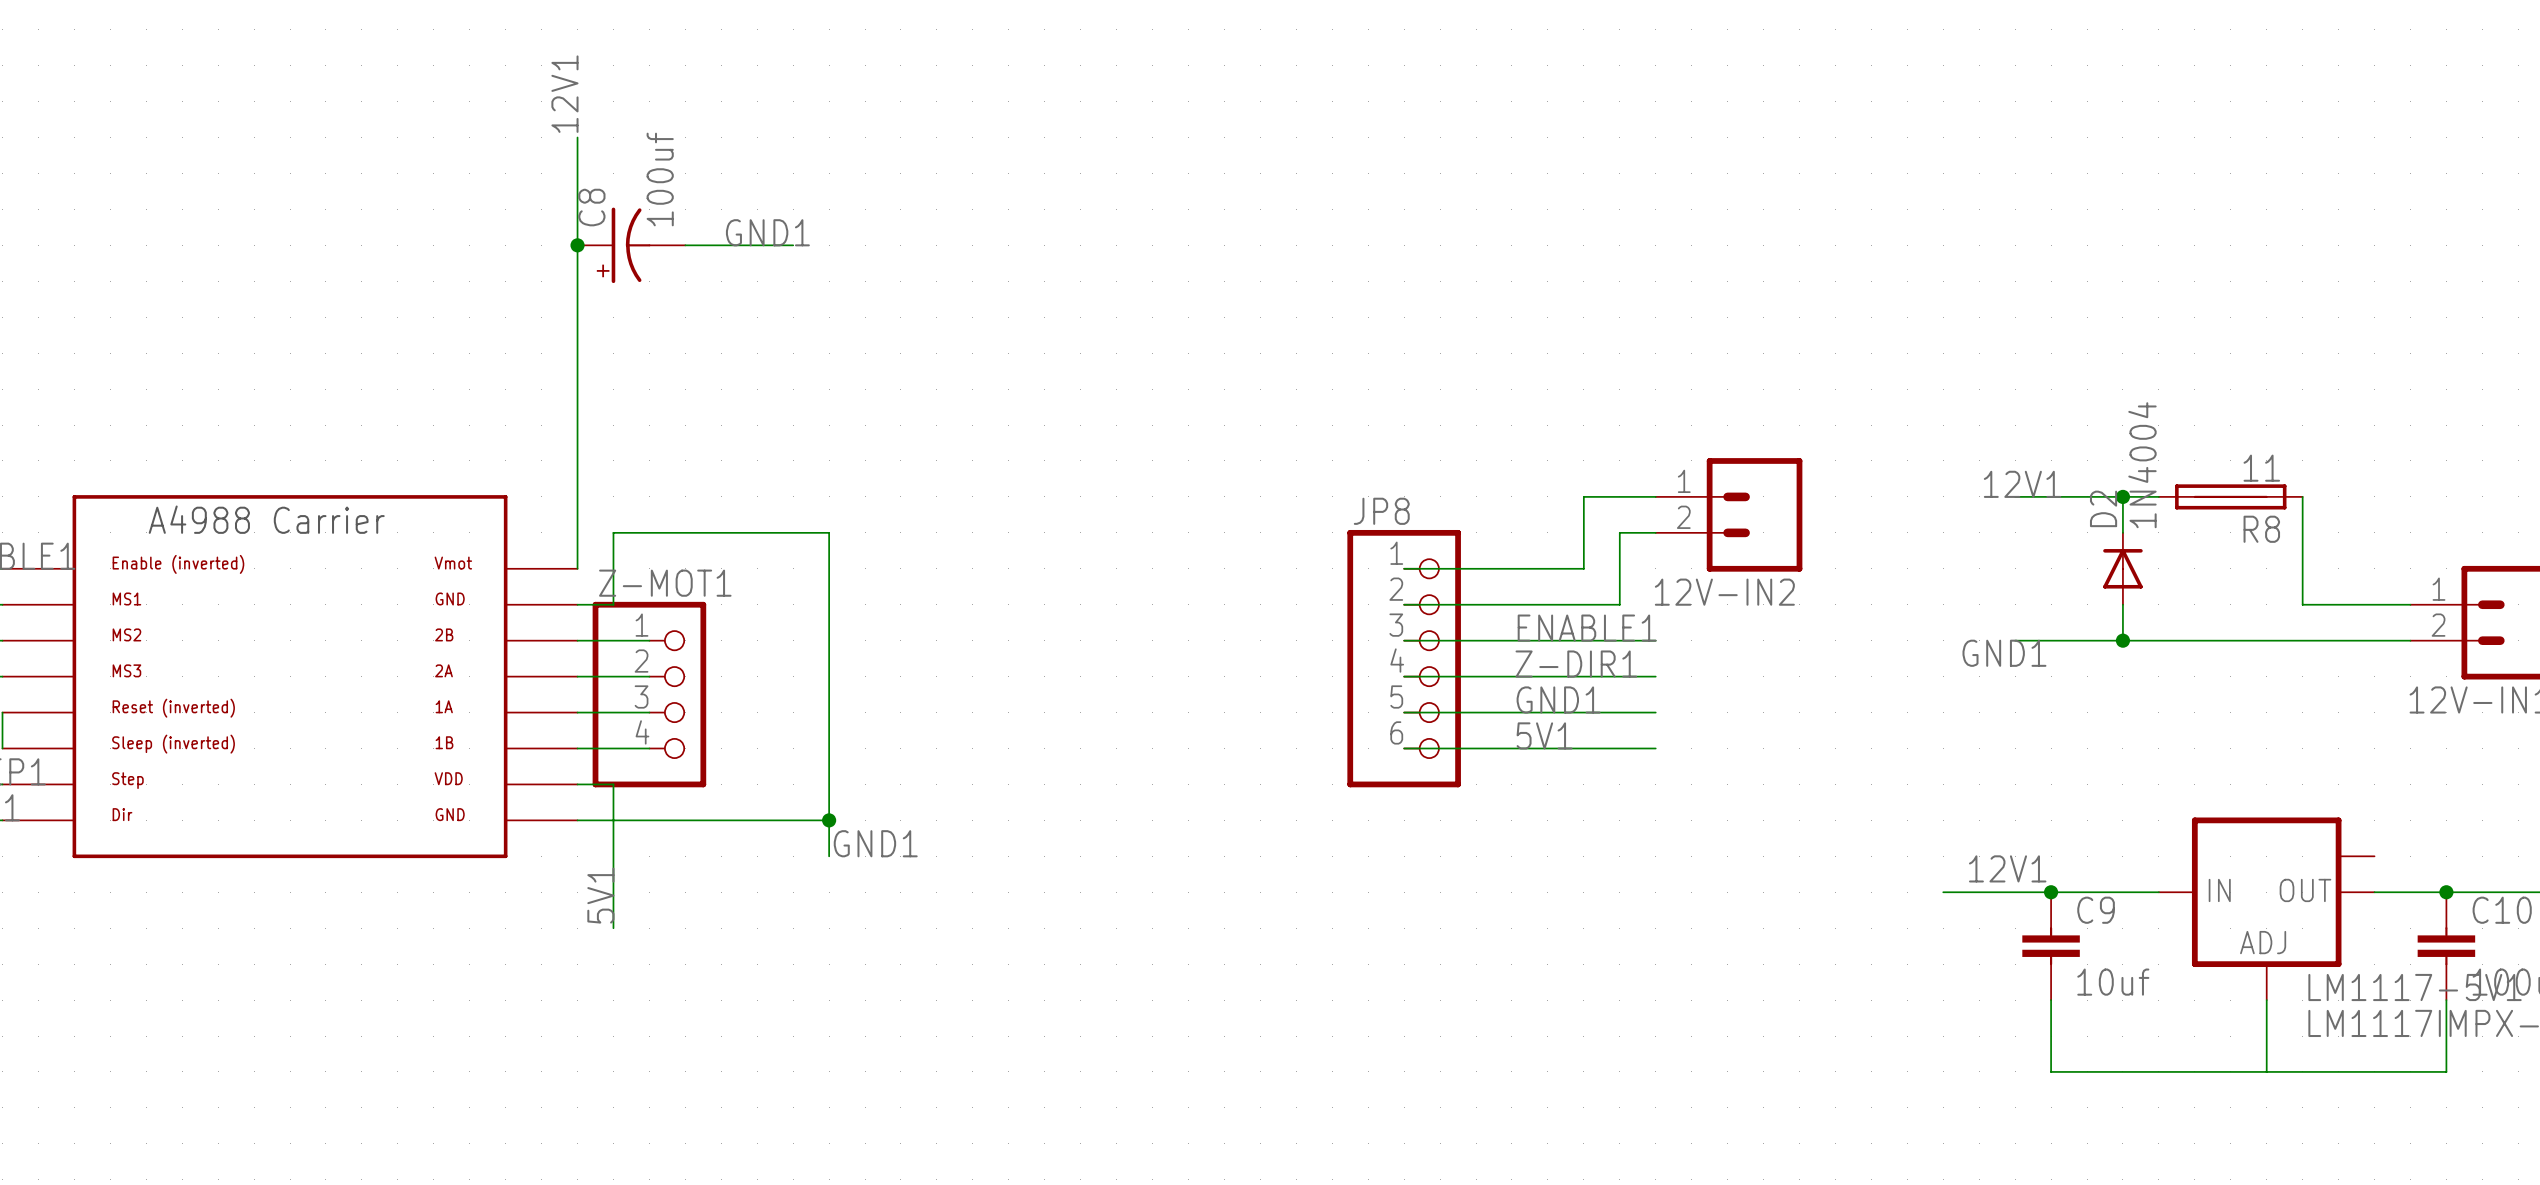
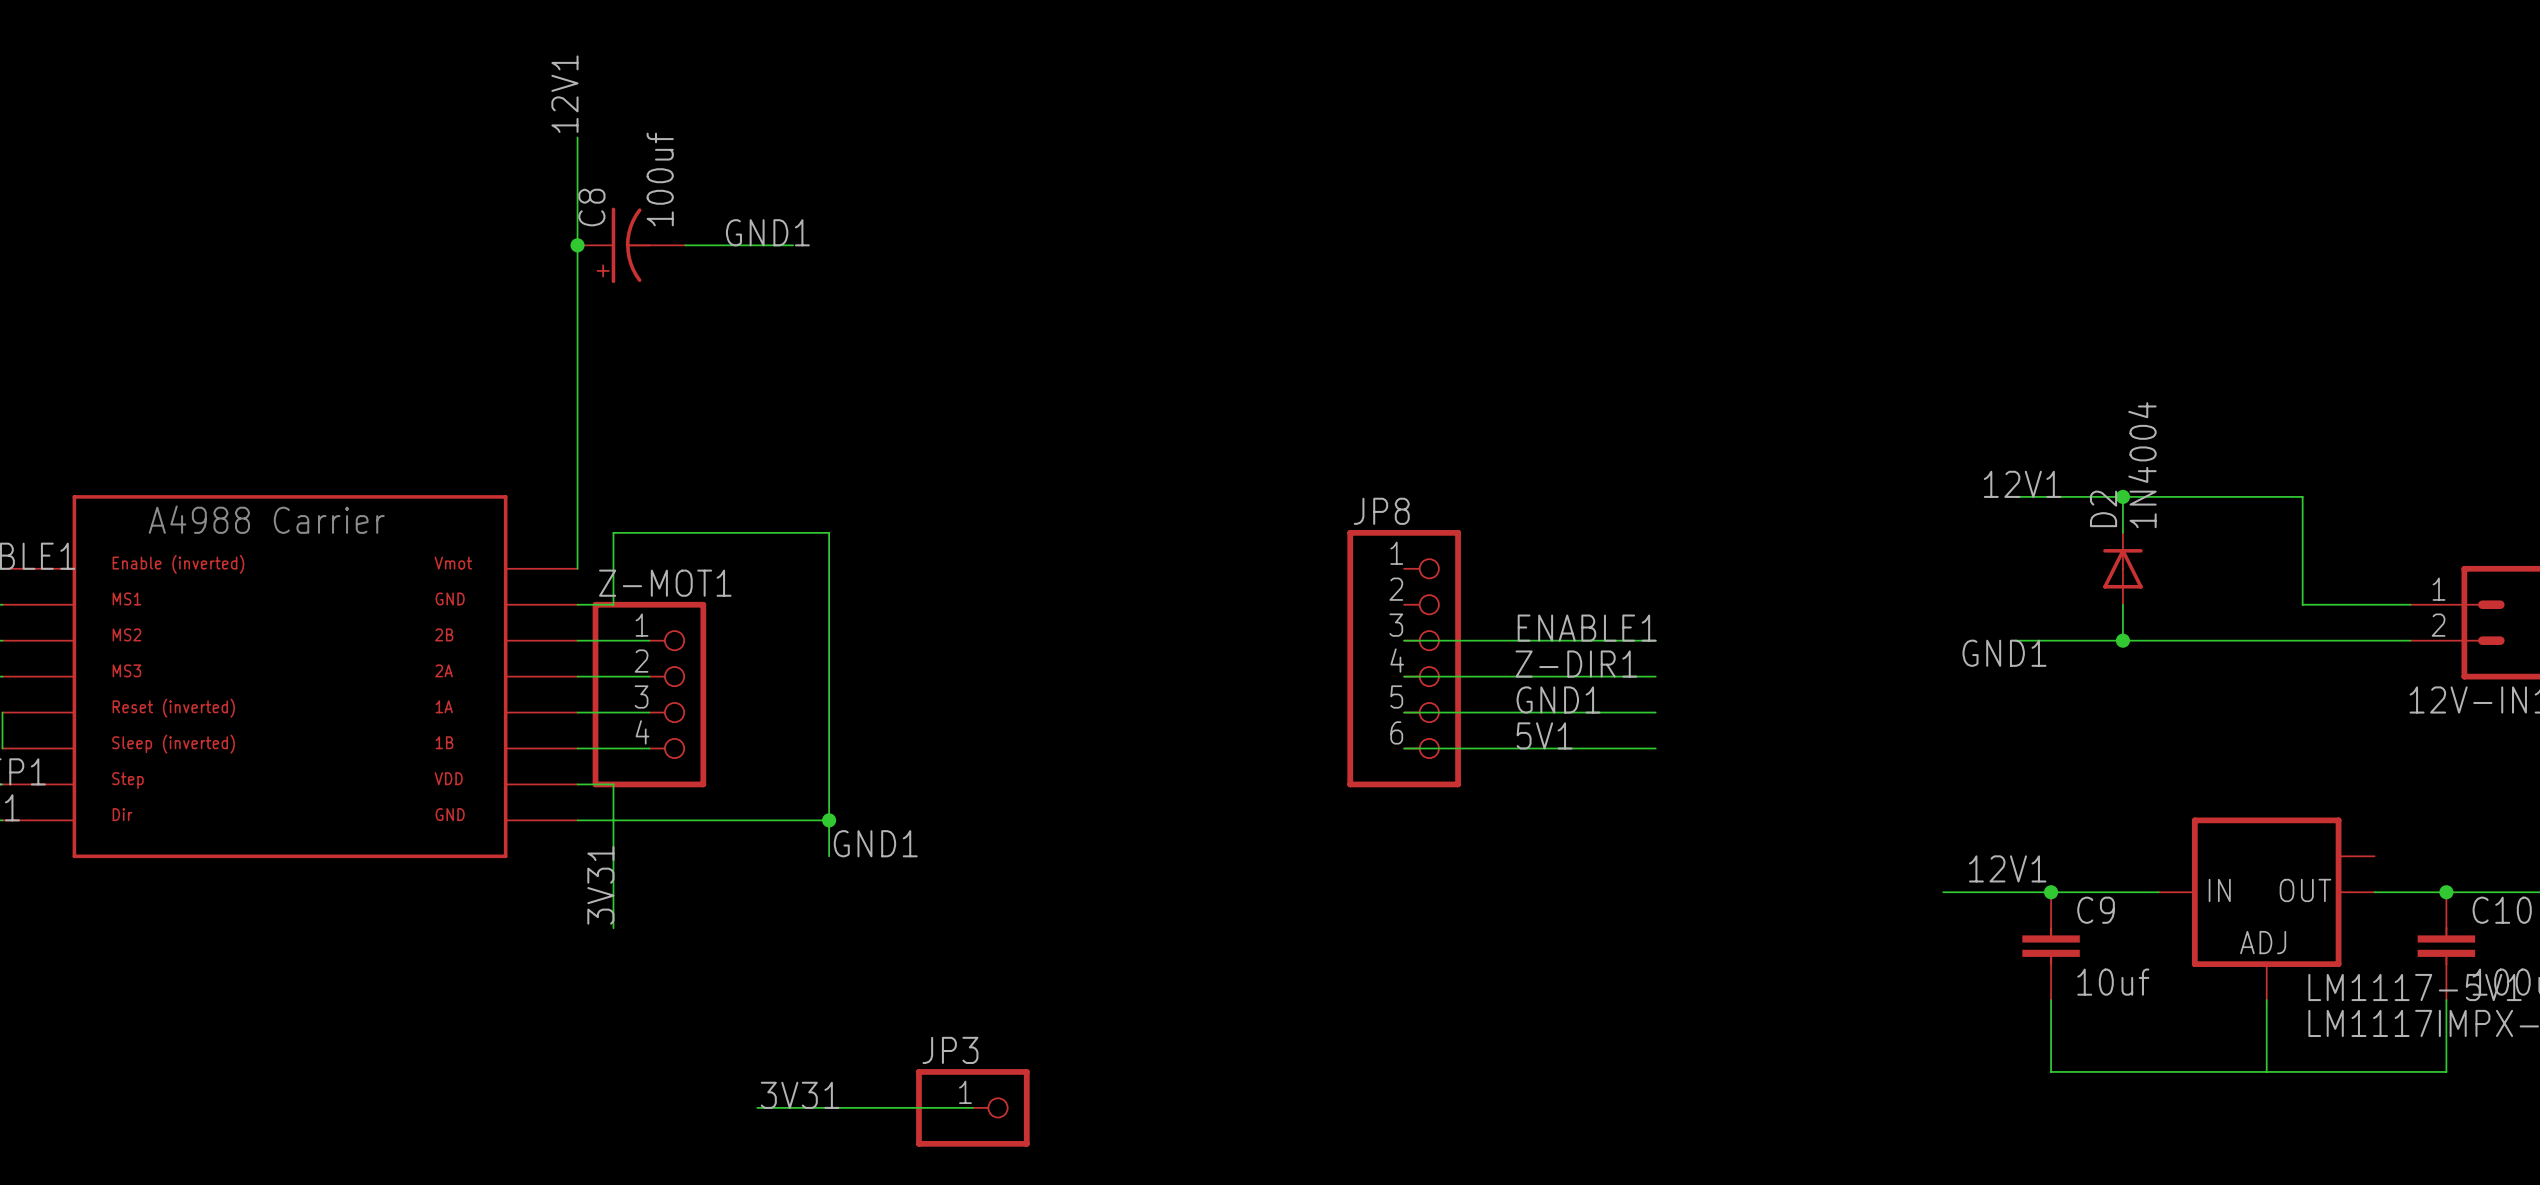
wire: (1655, 496) (1583, 496) (1583, 568) (1404, 568) -> none
R8: 11 (2230, 496) -> none
12V-IN2: (1729, 514) -> none
wire: (1655, 532) (1619, 532) (1619, 604) (1404, 604) -> none
label: 5V1 (600, 895) -> 3V31 (600, 885)
label: none -> 3V31 (800, 1095)
wire: none -> (757, 1107) (972, 1107)
JP3: none -> (972, 1107)

